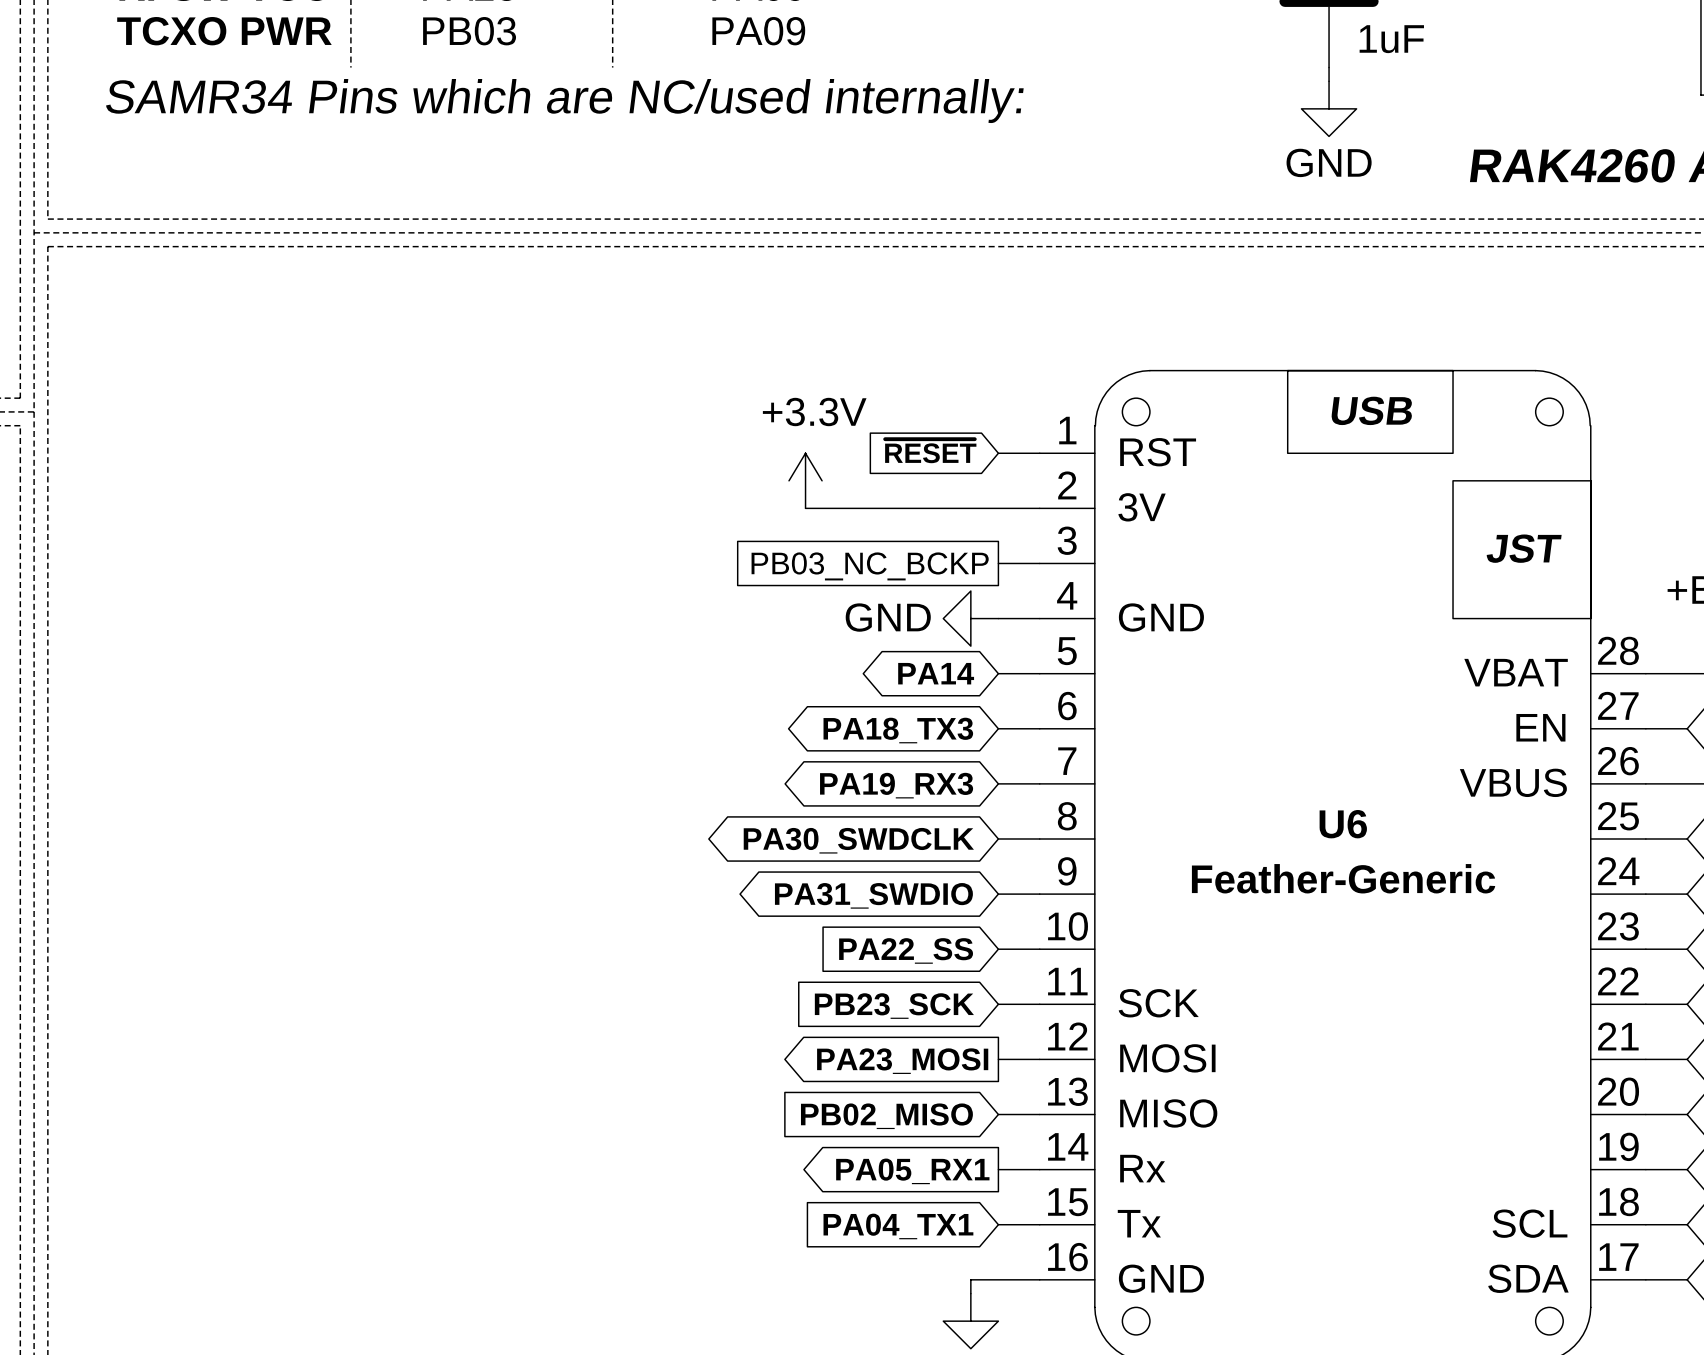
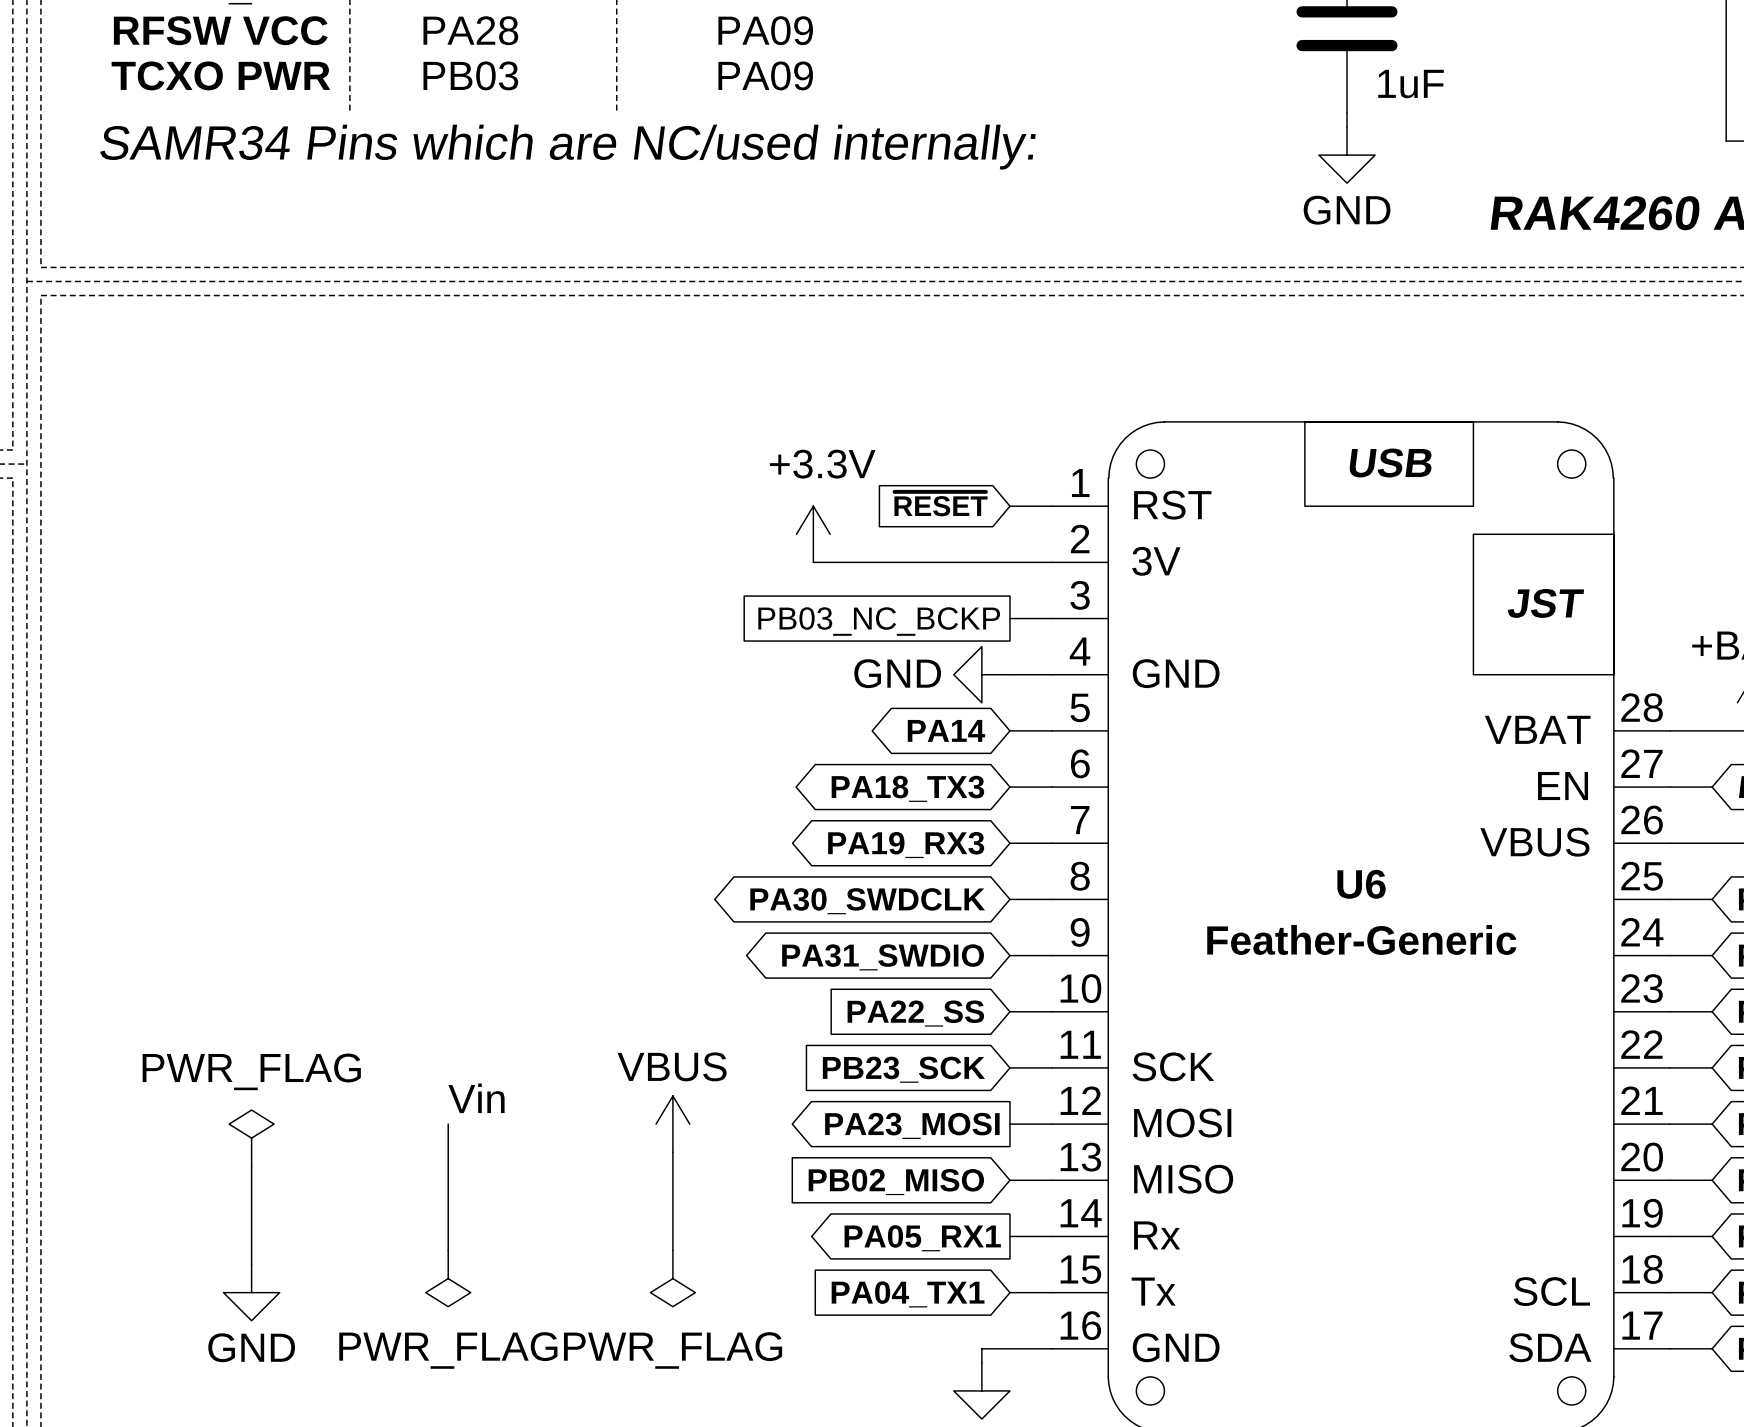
label: none -> Vin (476, 1098)
wire: none -> (448, 1124) (448, 1250)
power symbol: none -> VBUS (672, 1124)
power symbol: none -> PWR_FLAG (251, 1138)
wire: none -> (672, 1152) (672, 1250)
wire: none -> (251, 1166) (251, 1264)
power symbol: none -> PWR_FLAG (448, 1278)
power symbol: none -> PWR_FLAG (672, 1278)
power symbol: none -> GND (251, 1292)

